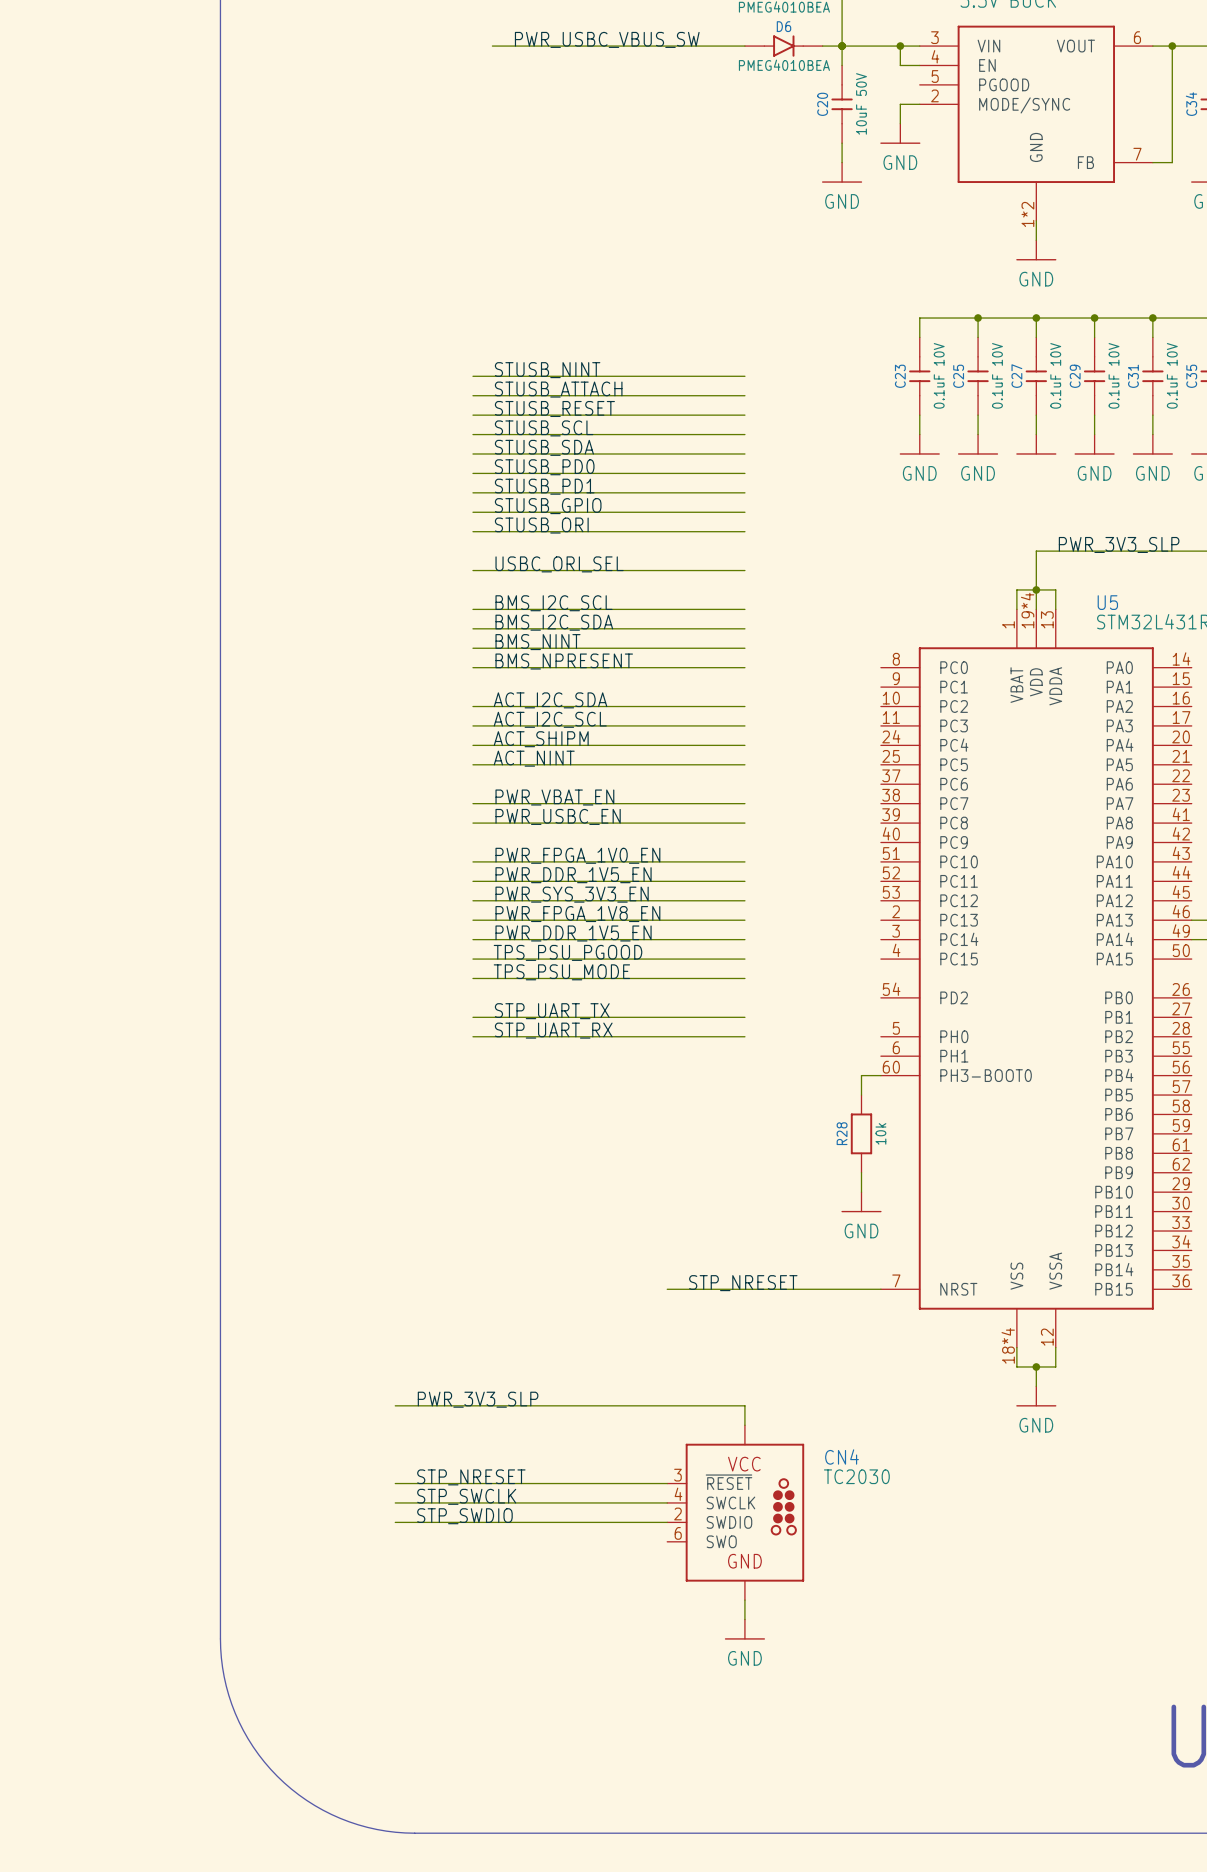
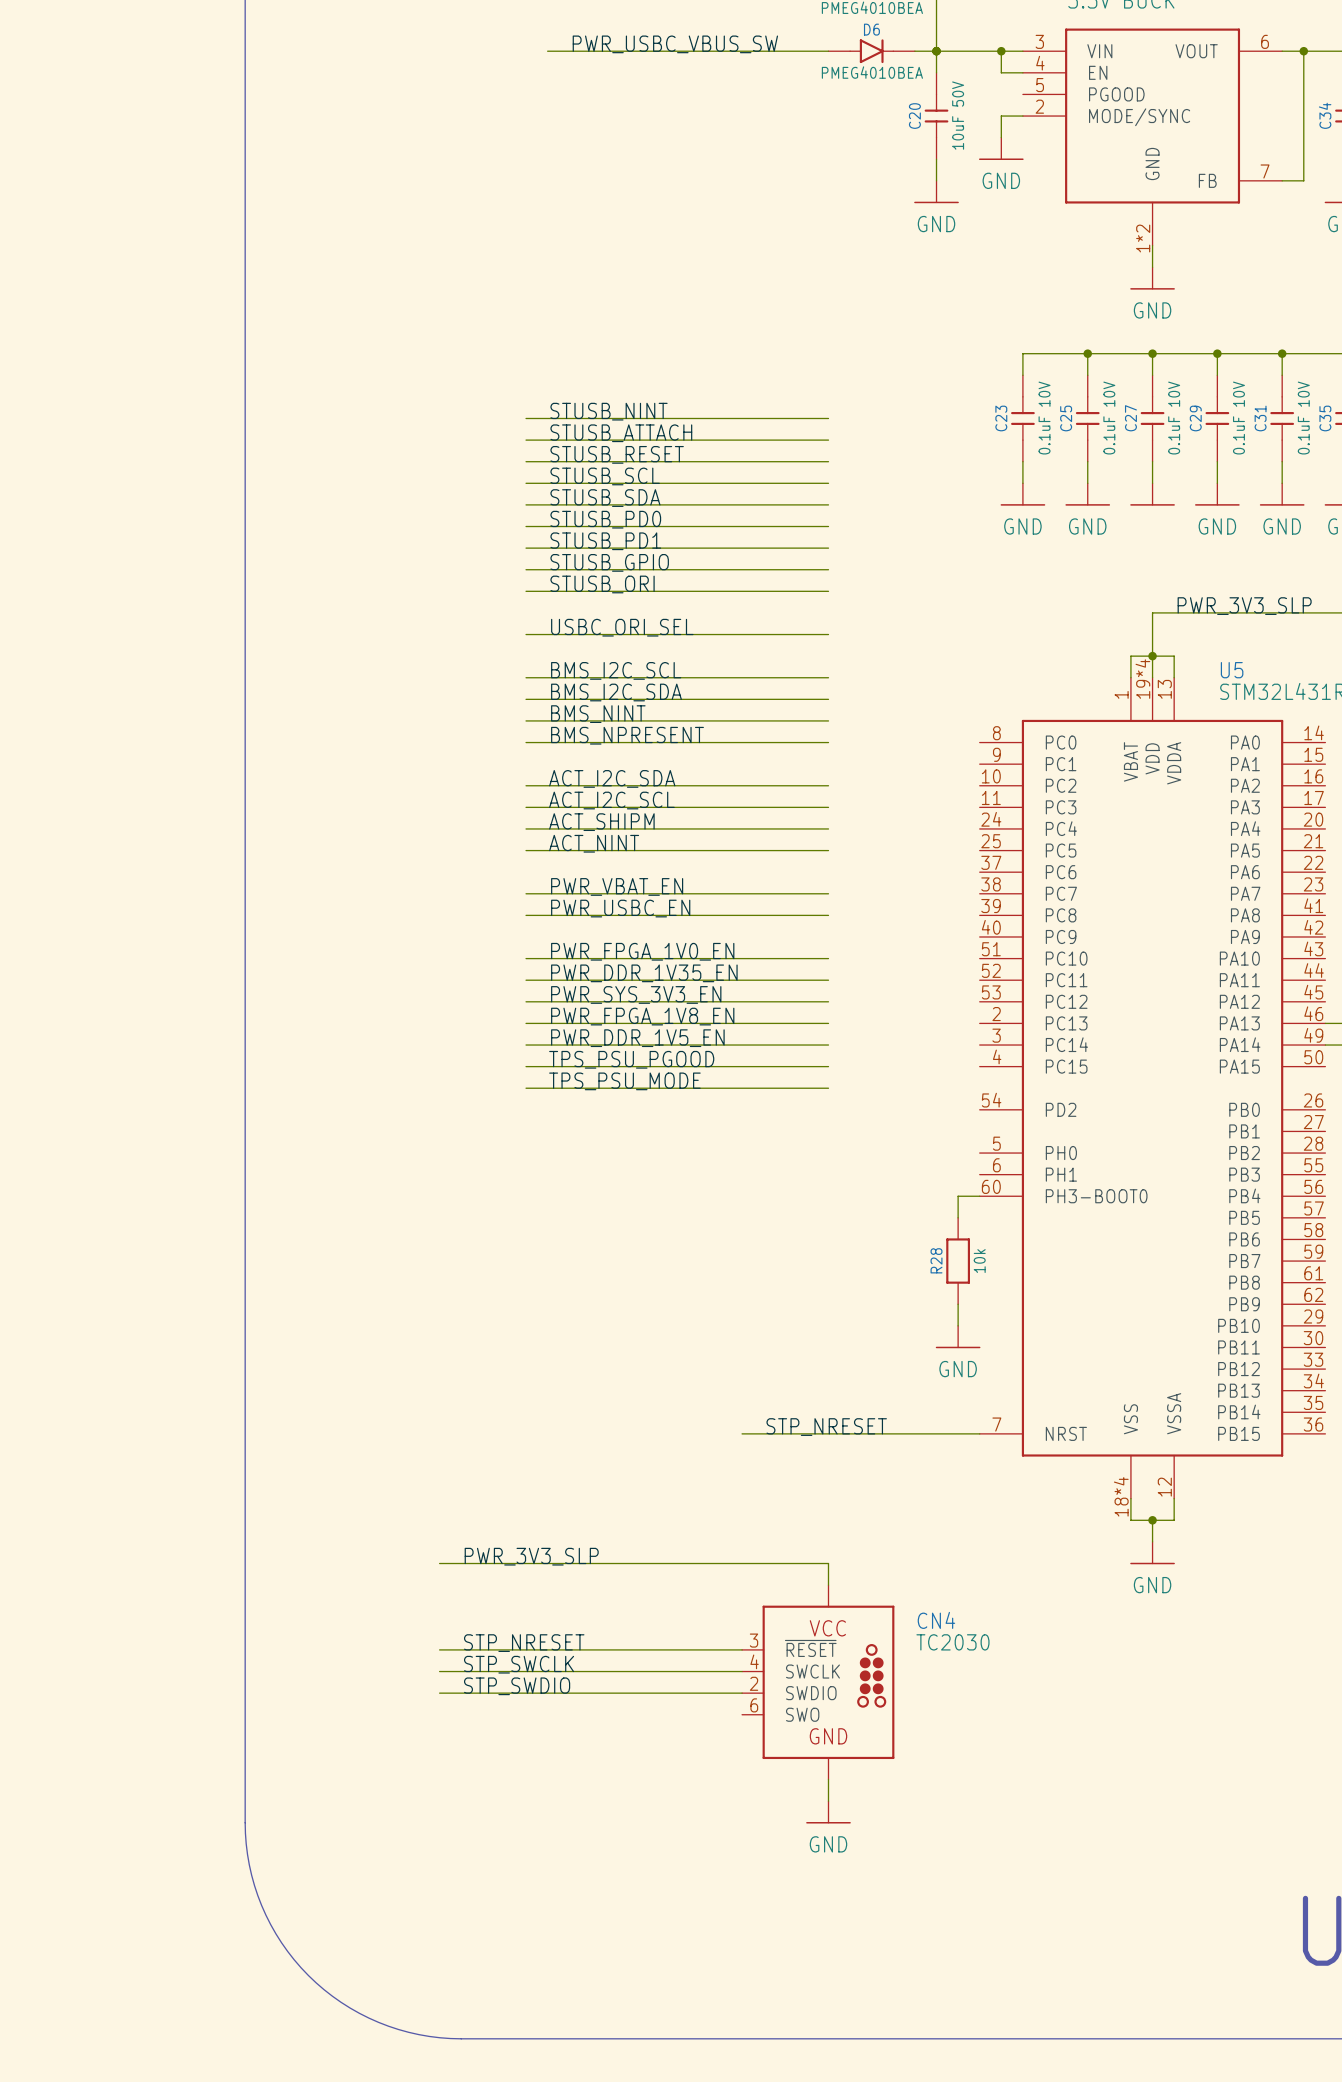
label: PWR_DDR_1V5_EN (573, 875) -> PWR_DDR_1V35_EN (644, 973)
label: STP_UART_TX (552, 1011) -> none
wire: (472, 1017) (744, 1017) -> none
label: STP_UART_RX (553, 1030) -> none
wire: (472, 1036) (744, 1036) -> none

